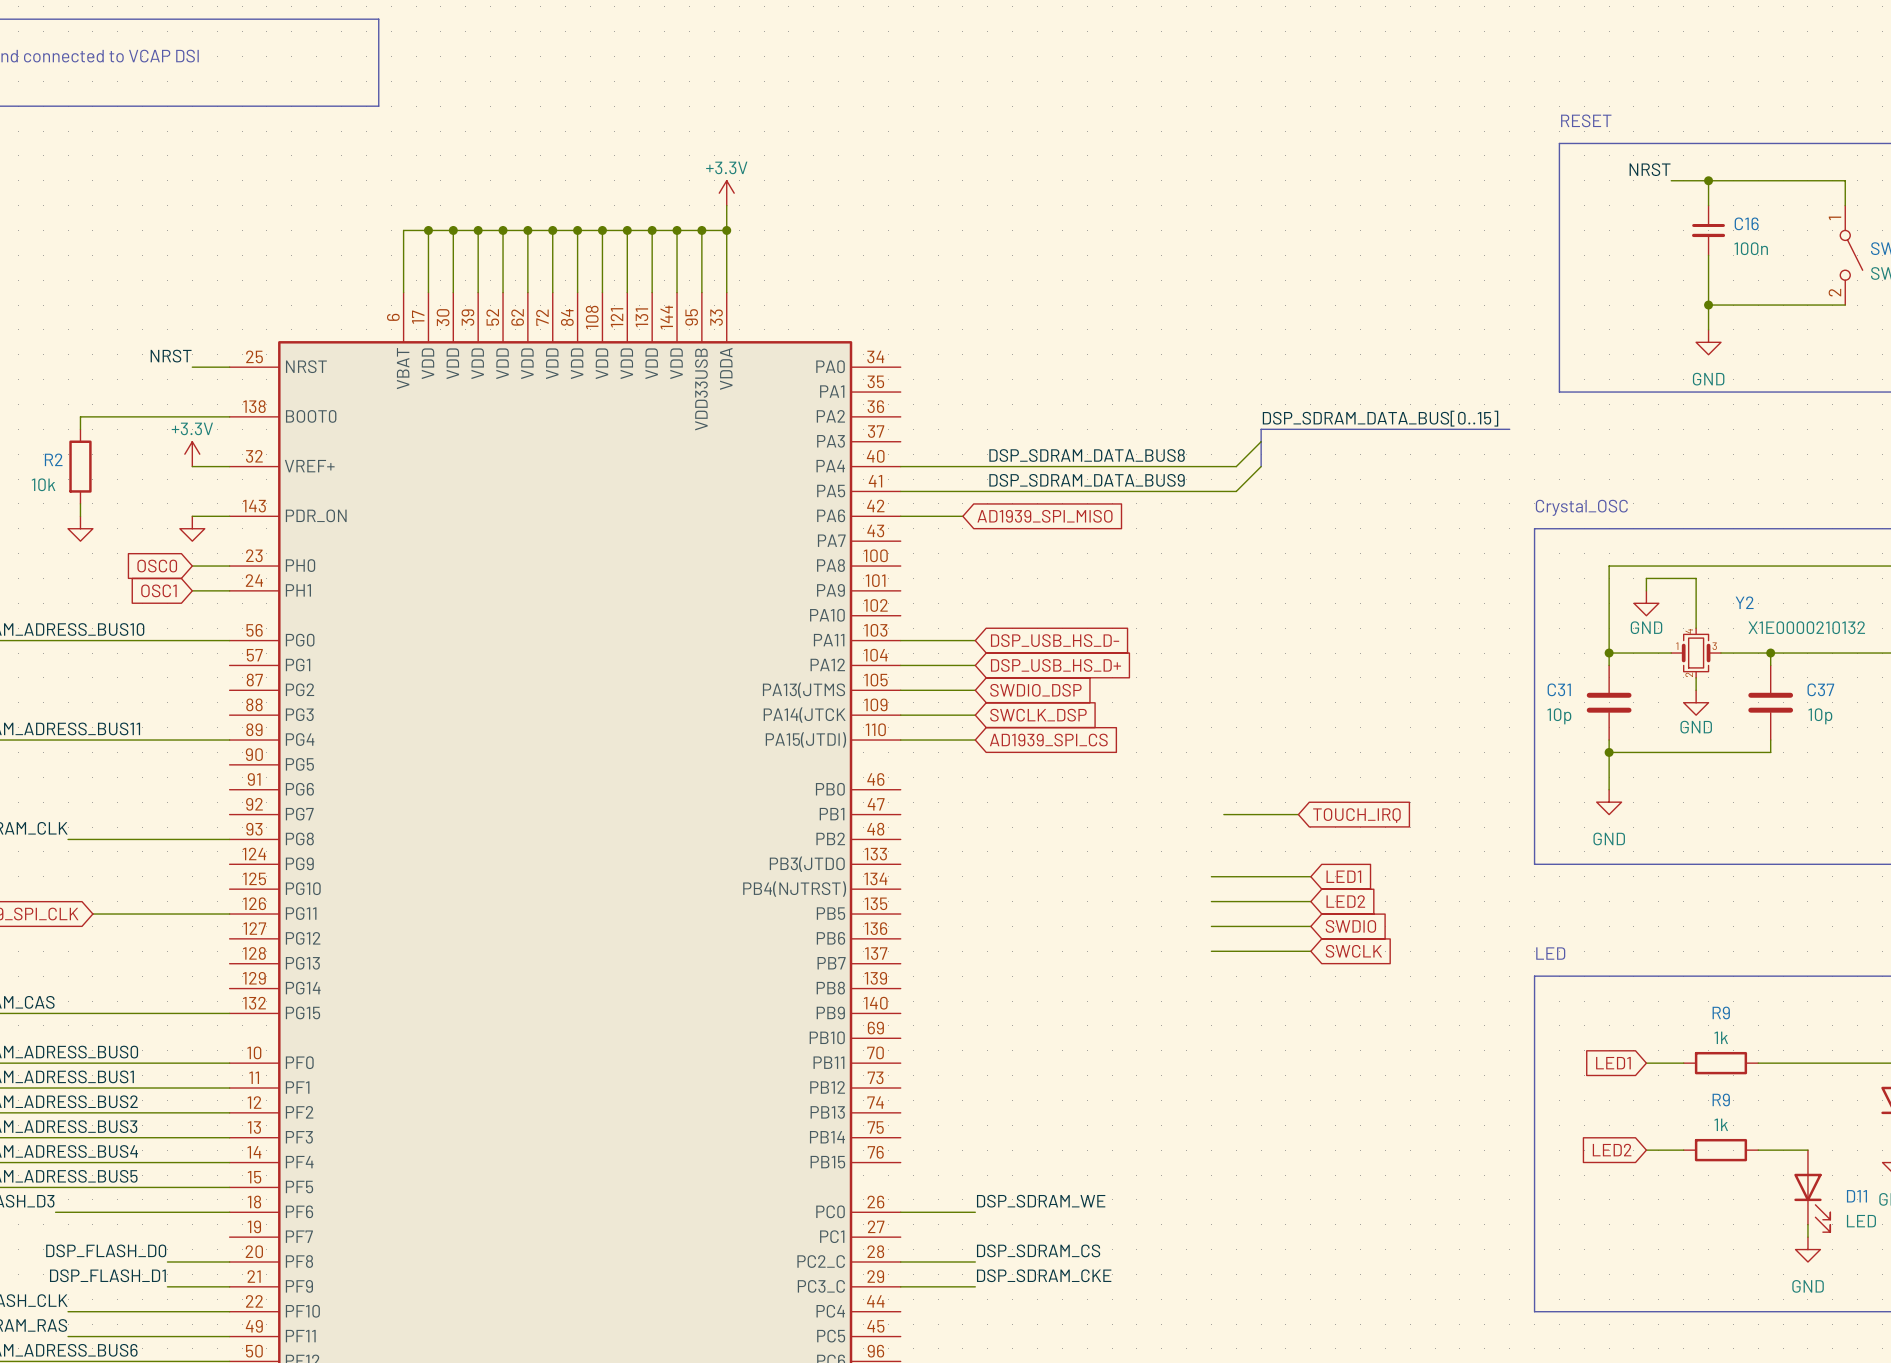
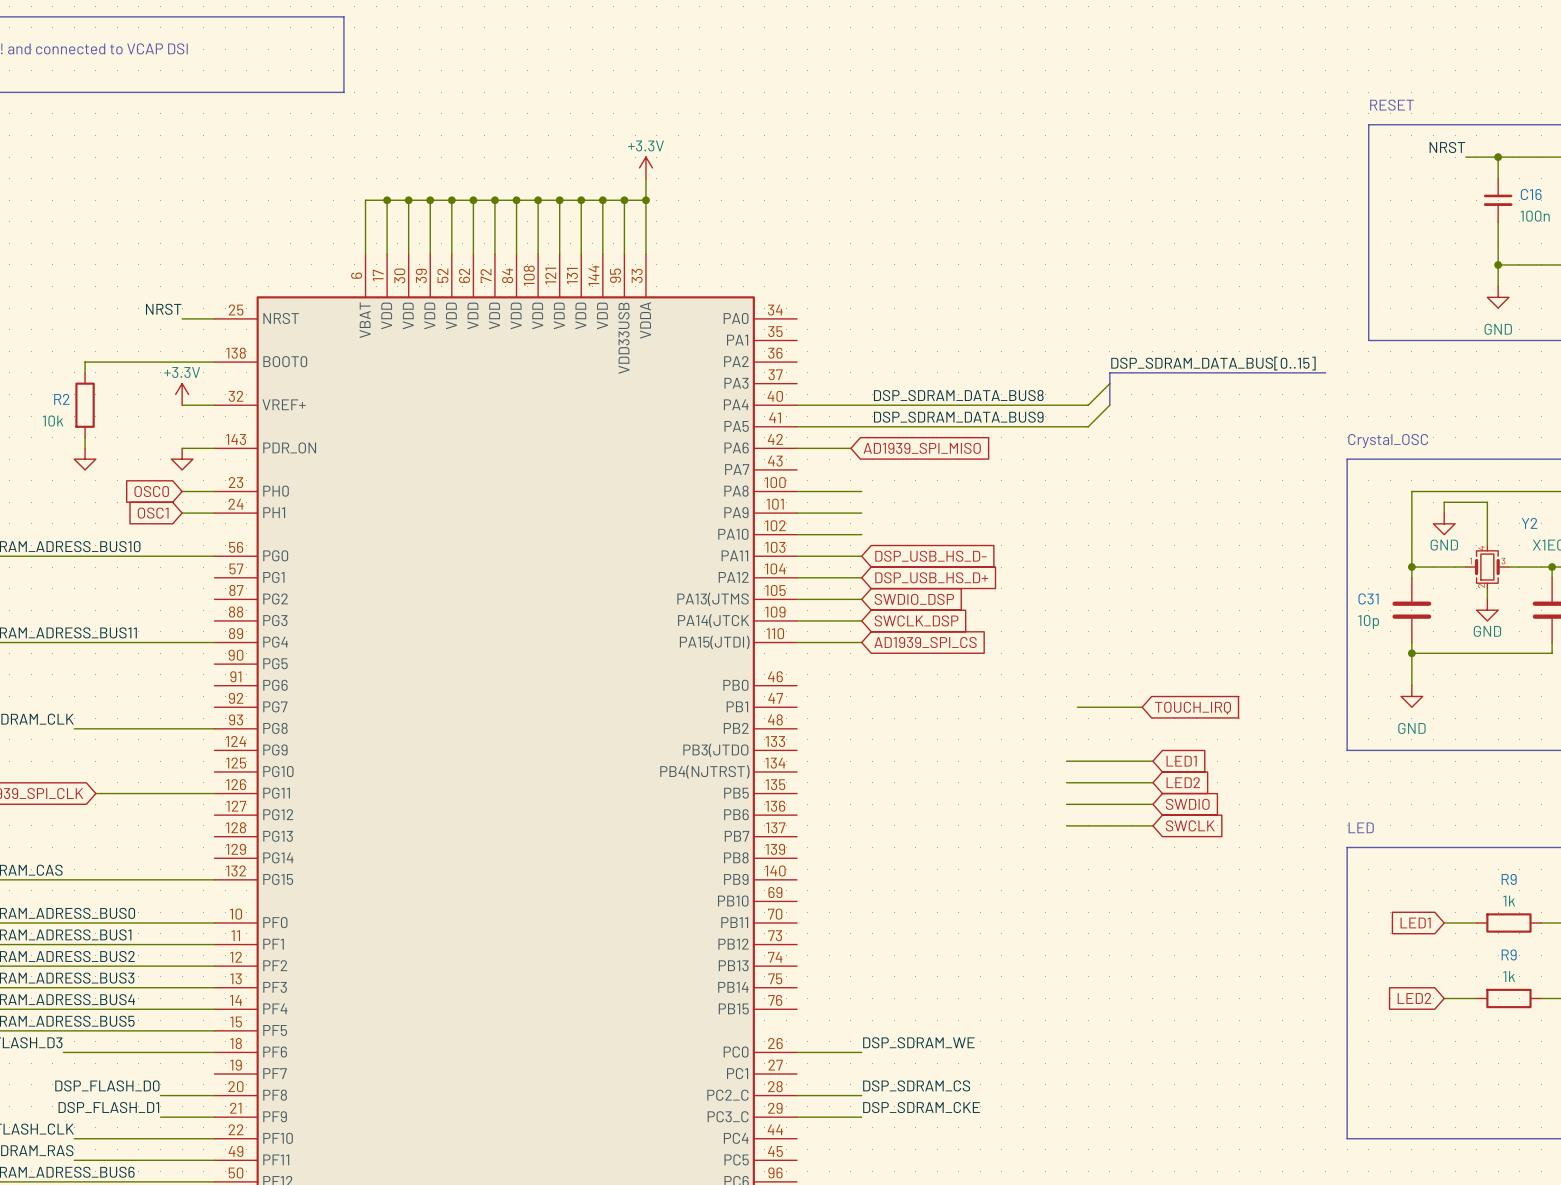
wire: none -> (797, 491) (861, 491)
wire: none -> (797, 513) (861, 513)
wire: none -> (797, 534) (861, 534)

